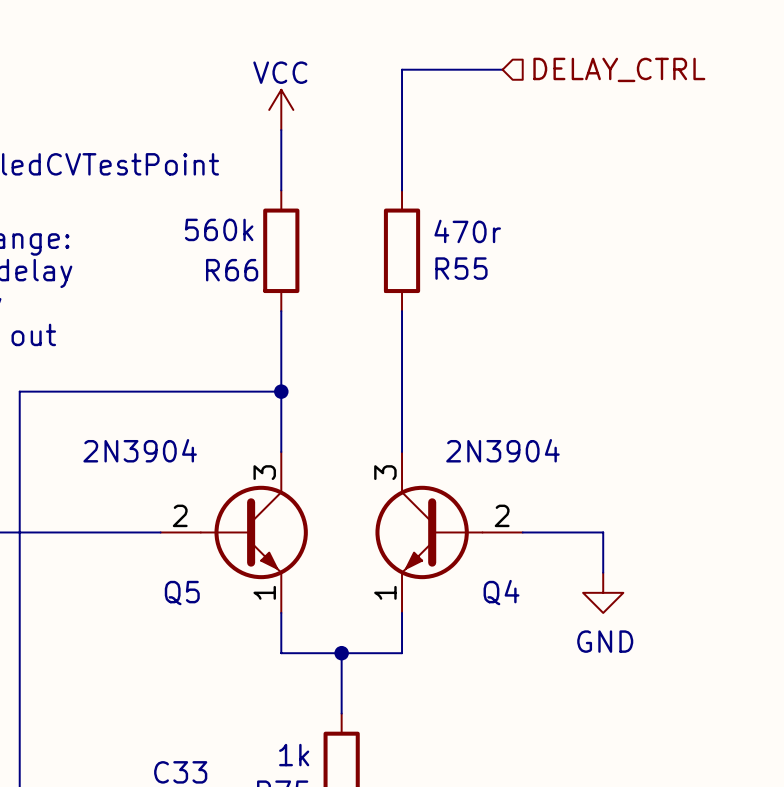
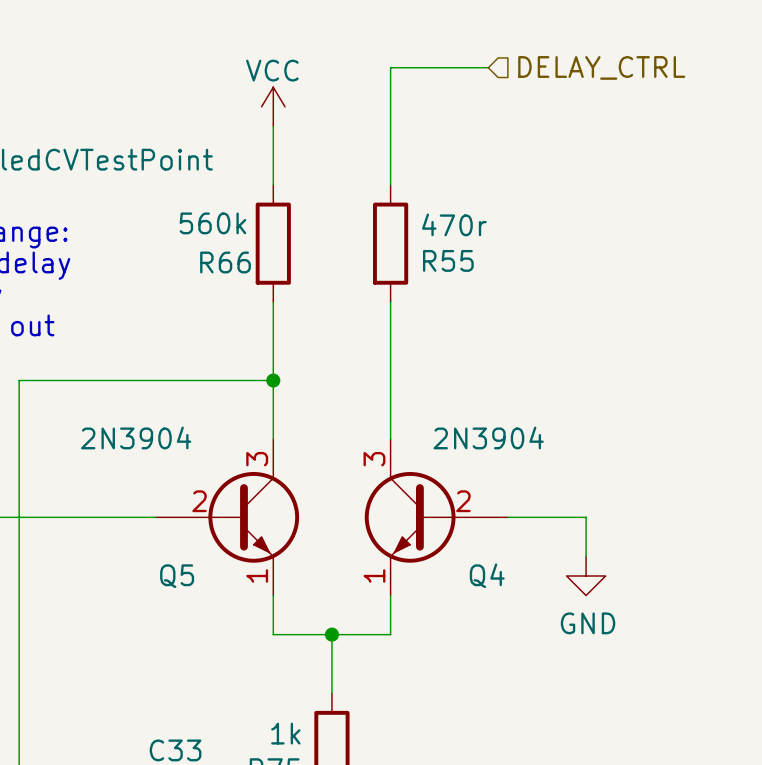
Q5 symbol: [160, 451, 308, 613] -> [156, 439, 300, 596]
Q4 symbol: [375, 451, 523, 613] -> [364, 439, 508, 596]

